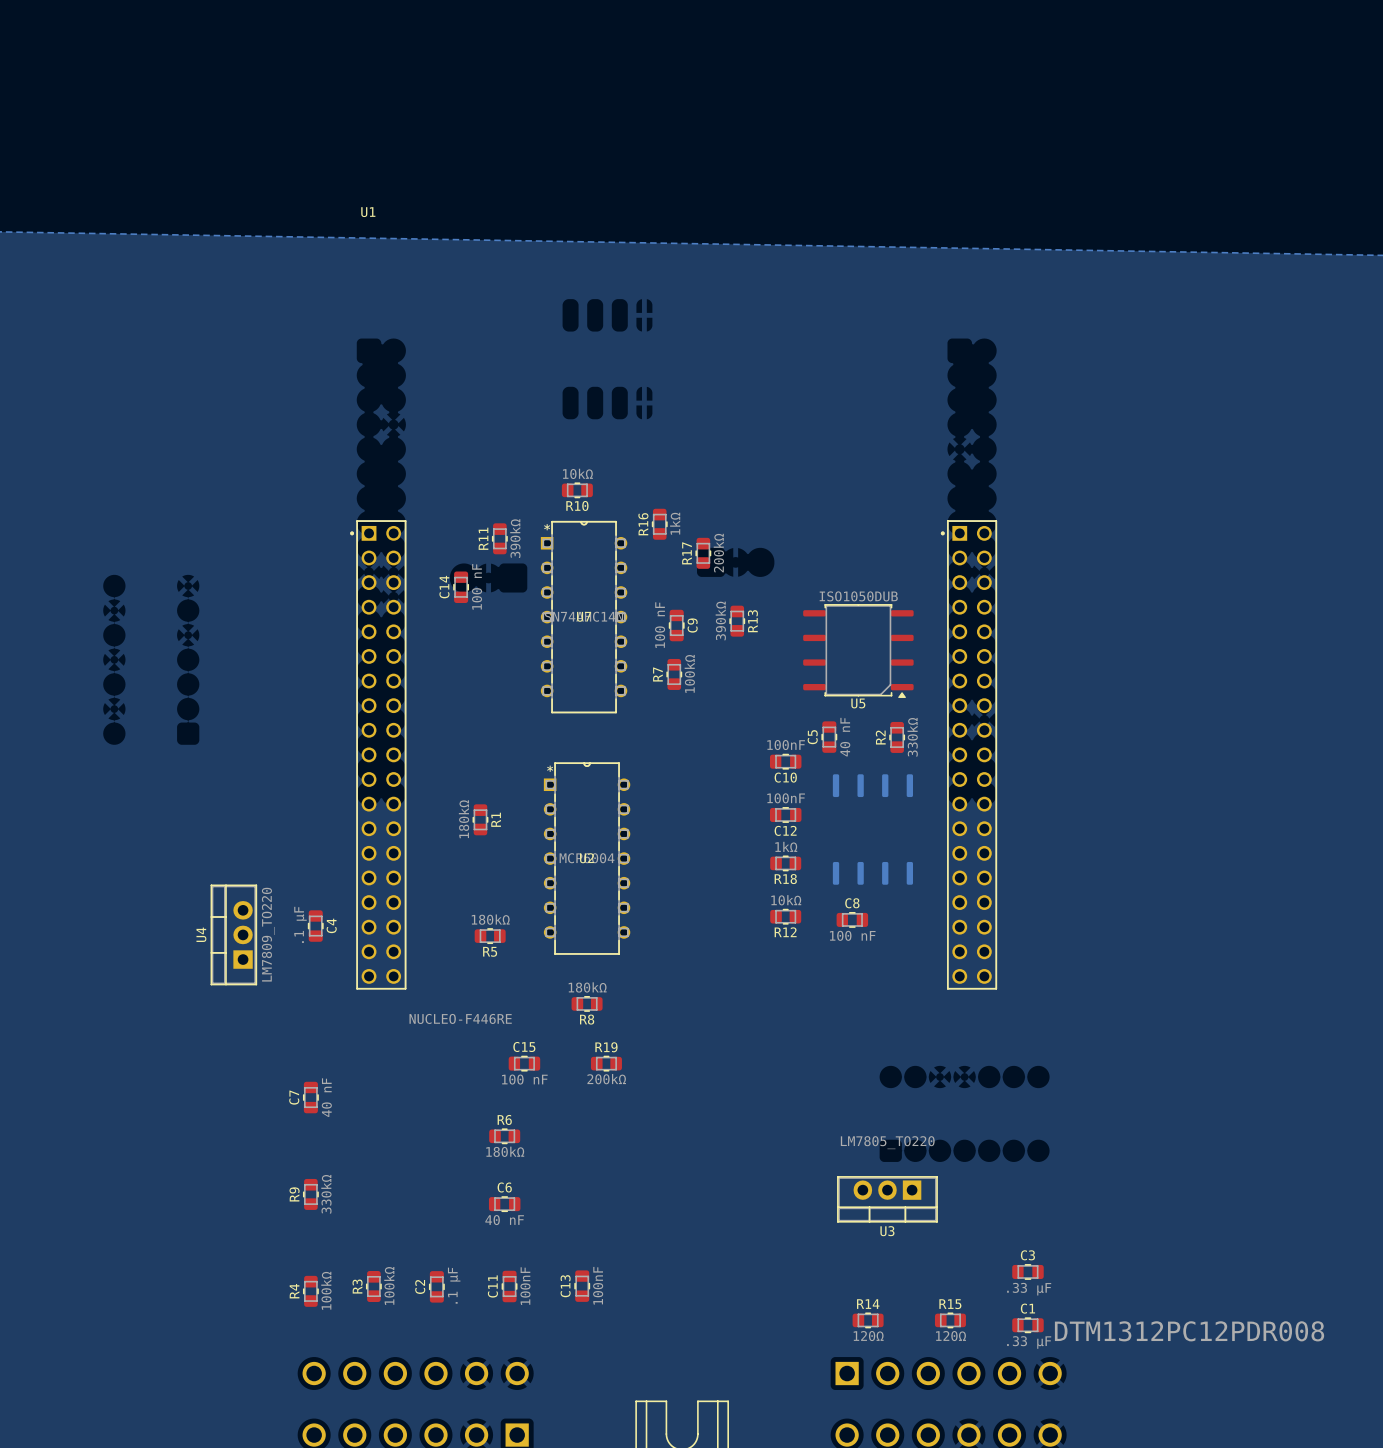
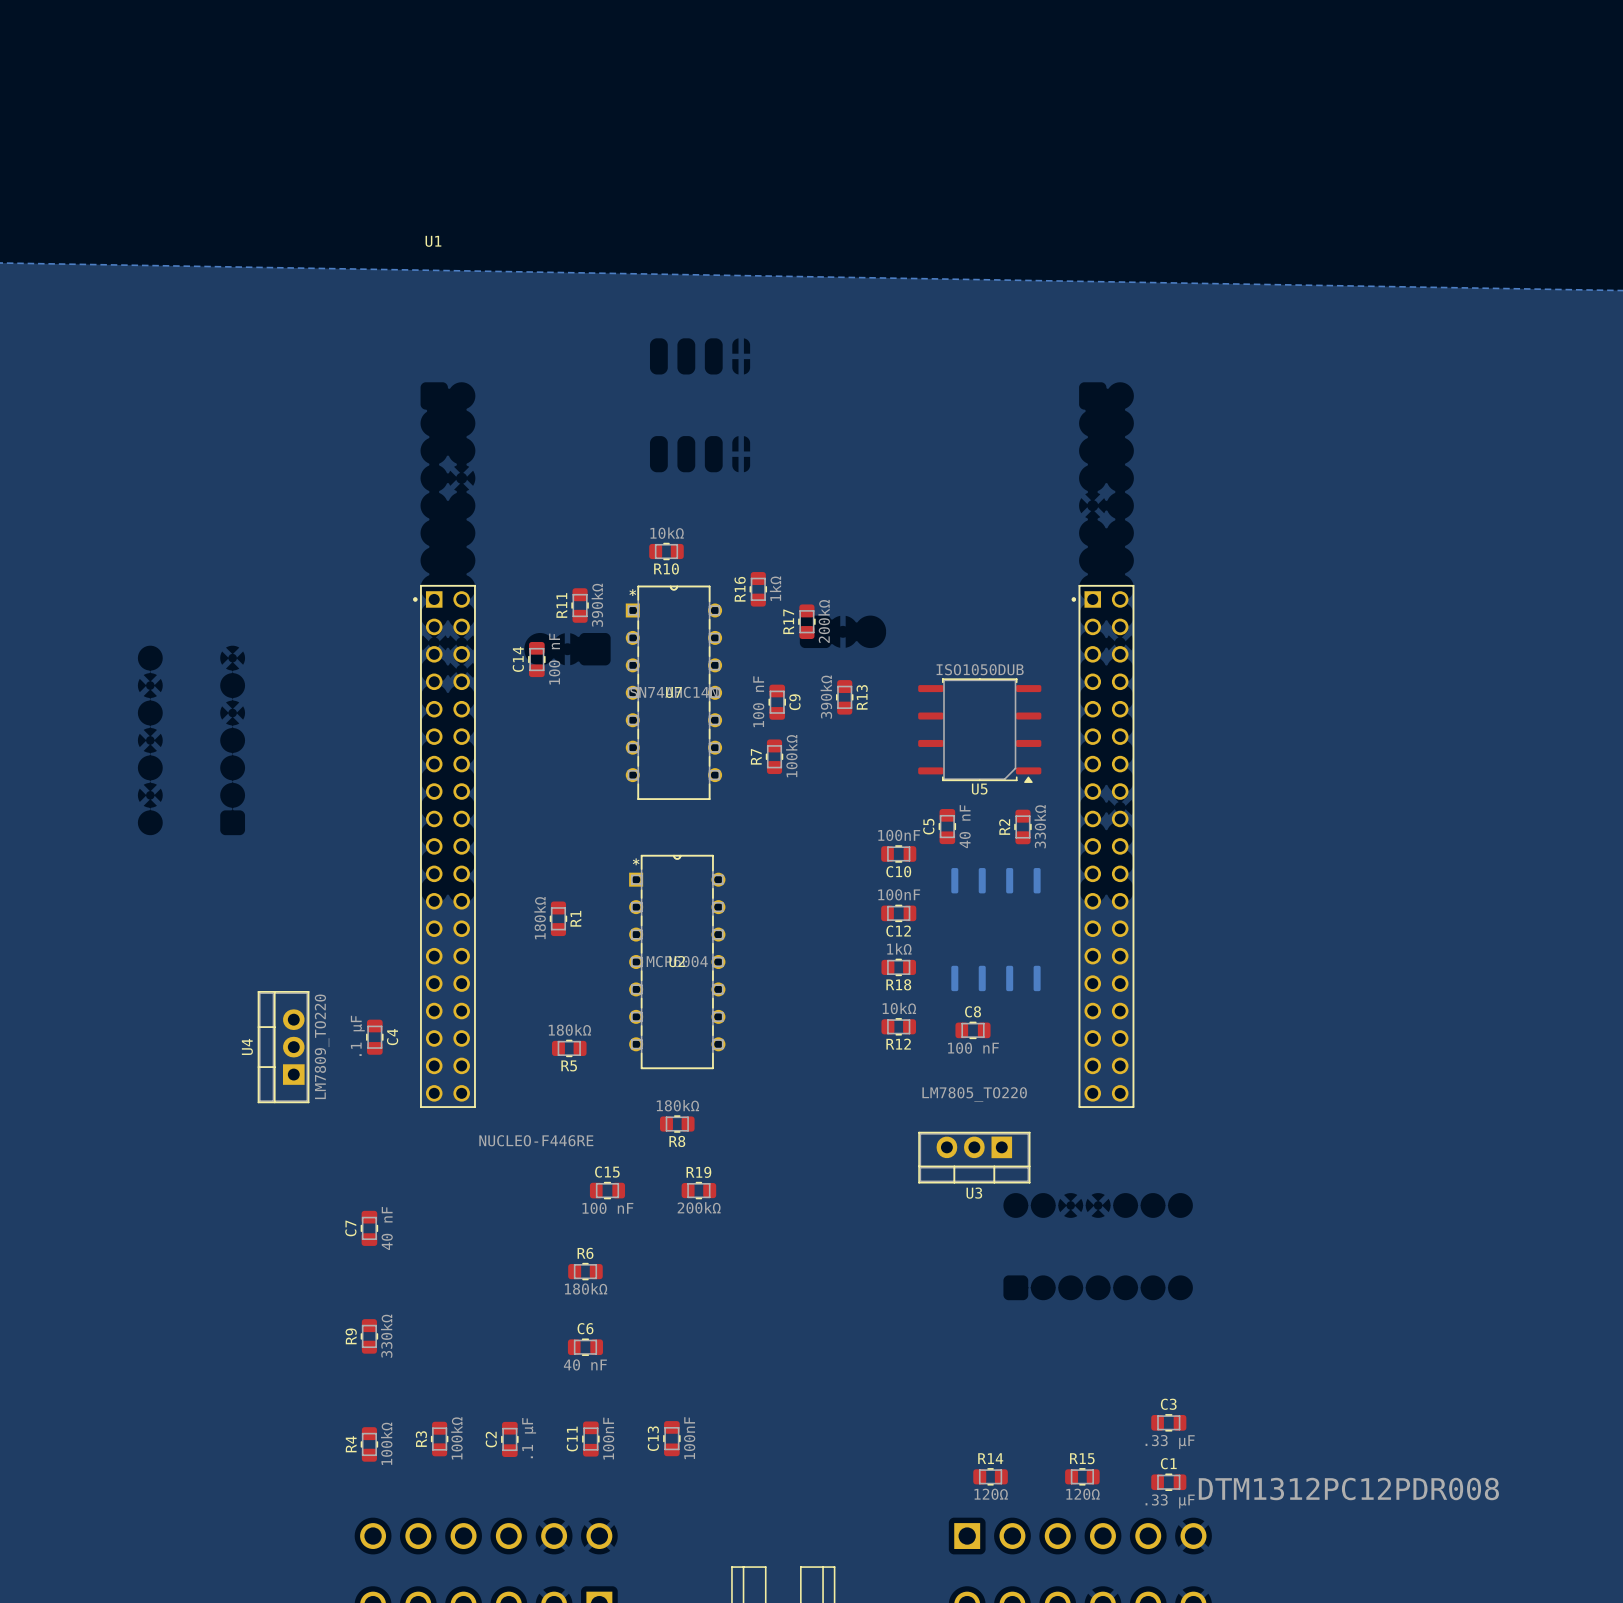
U3 position: (887, 1199) -> (974, 1157)

